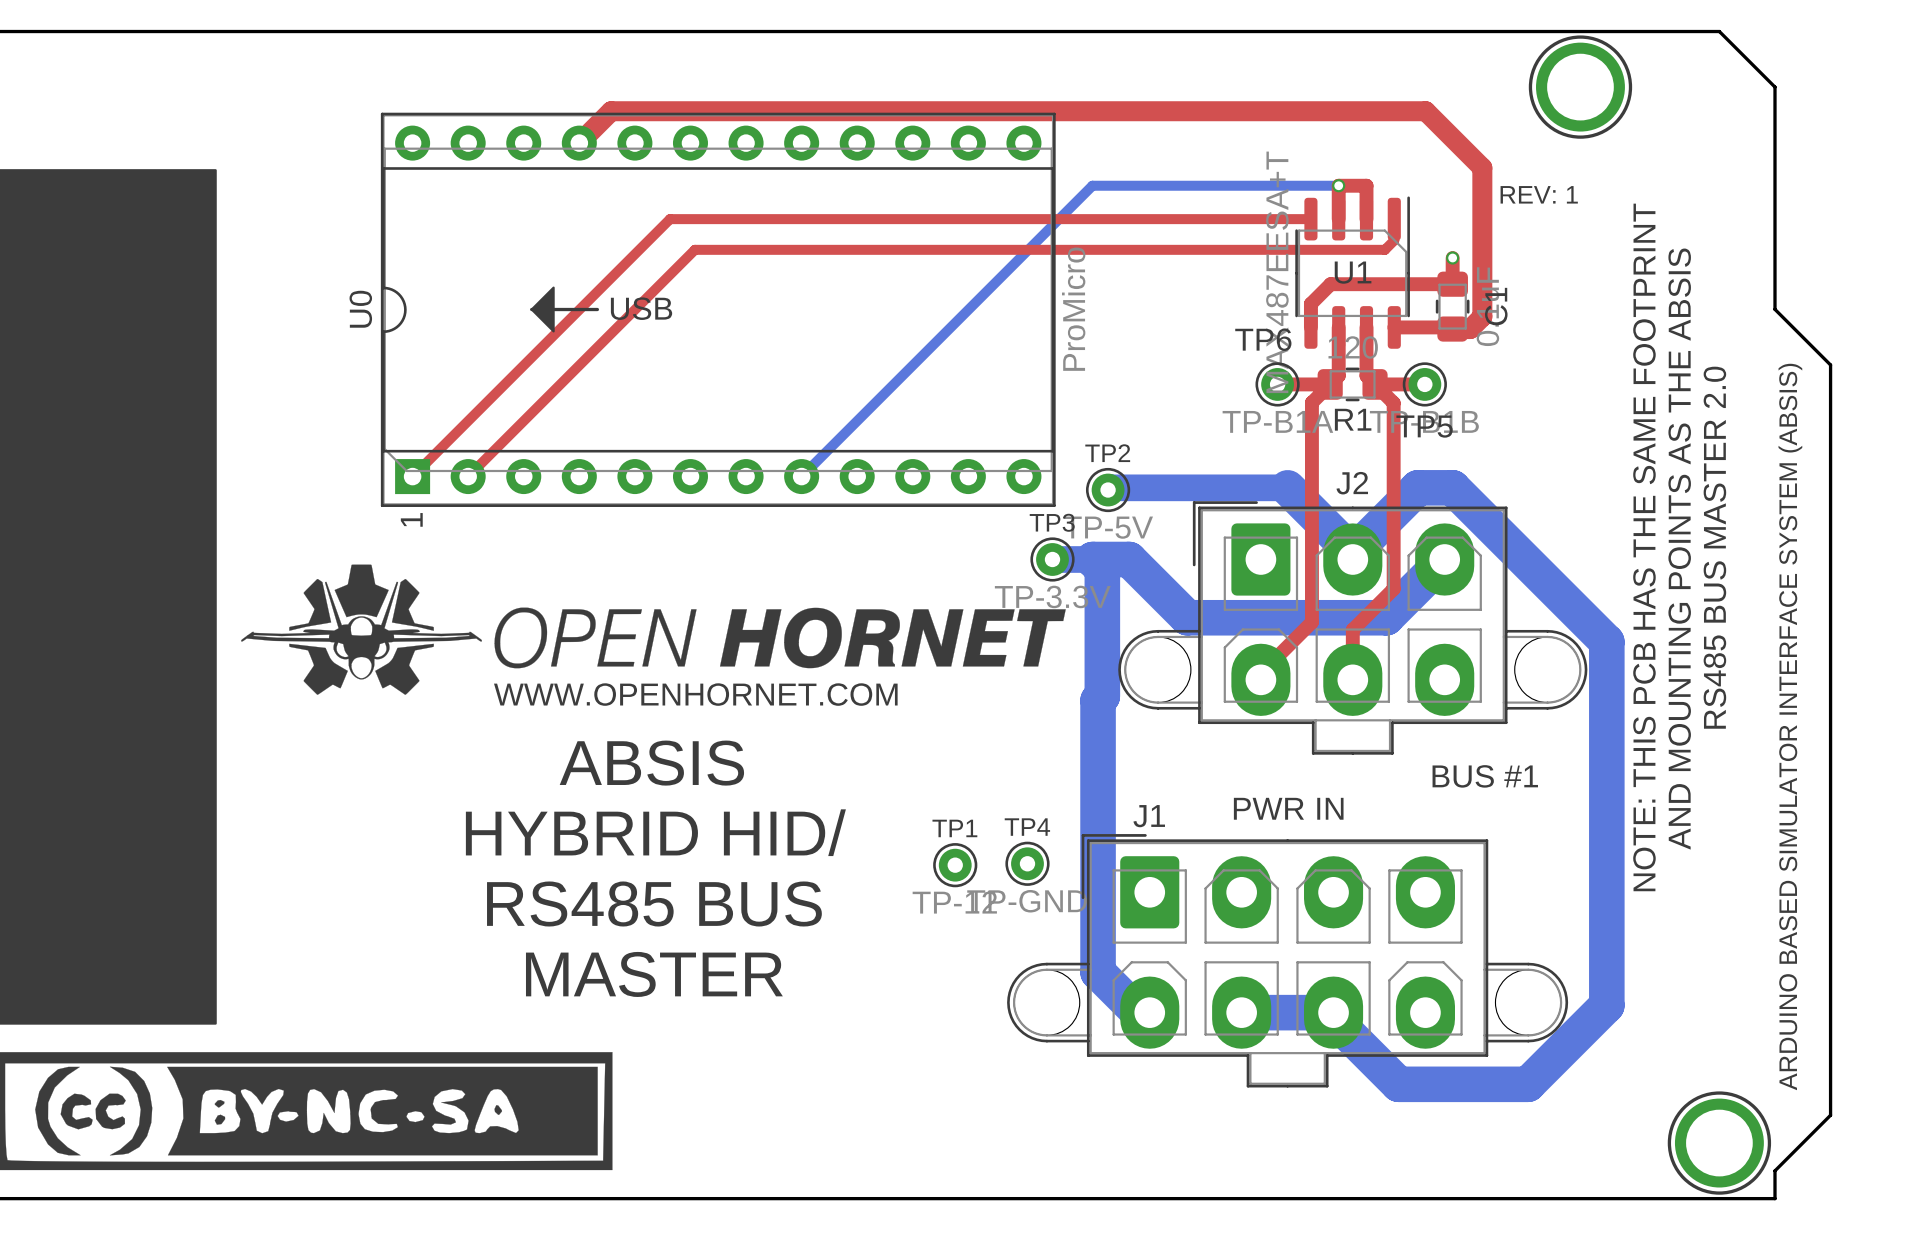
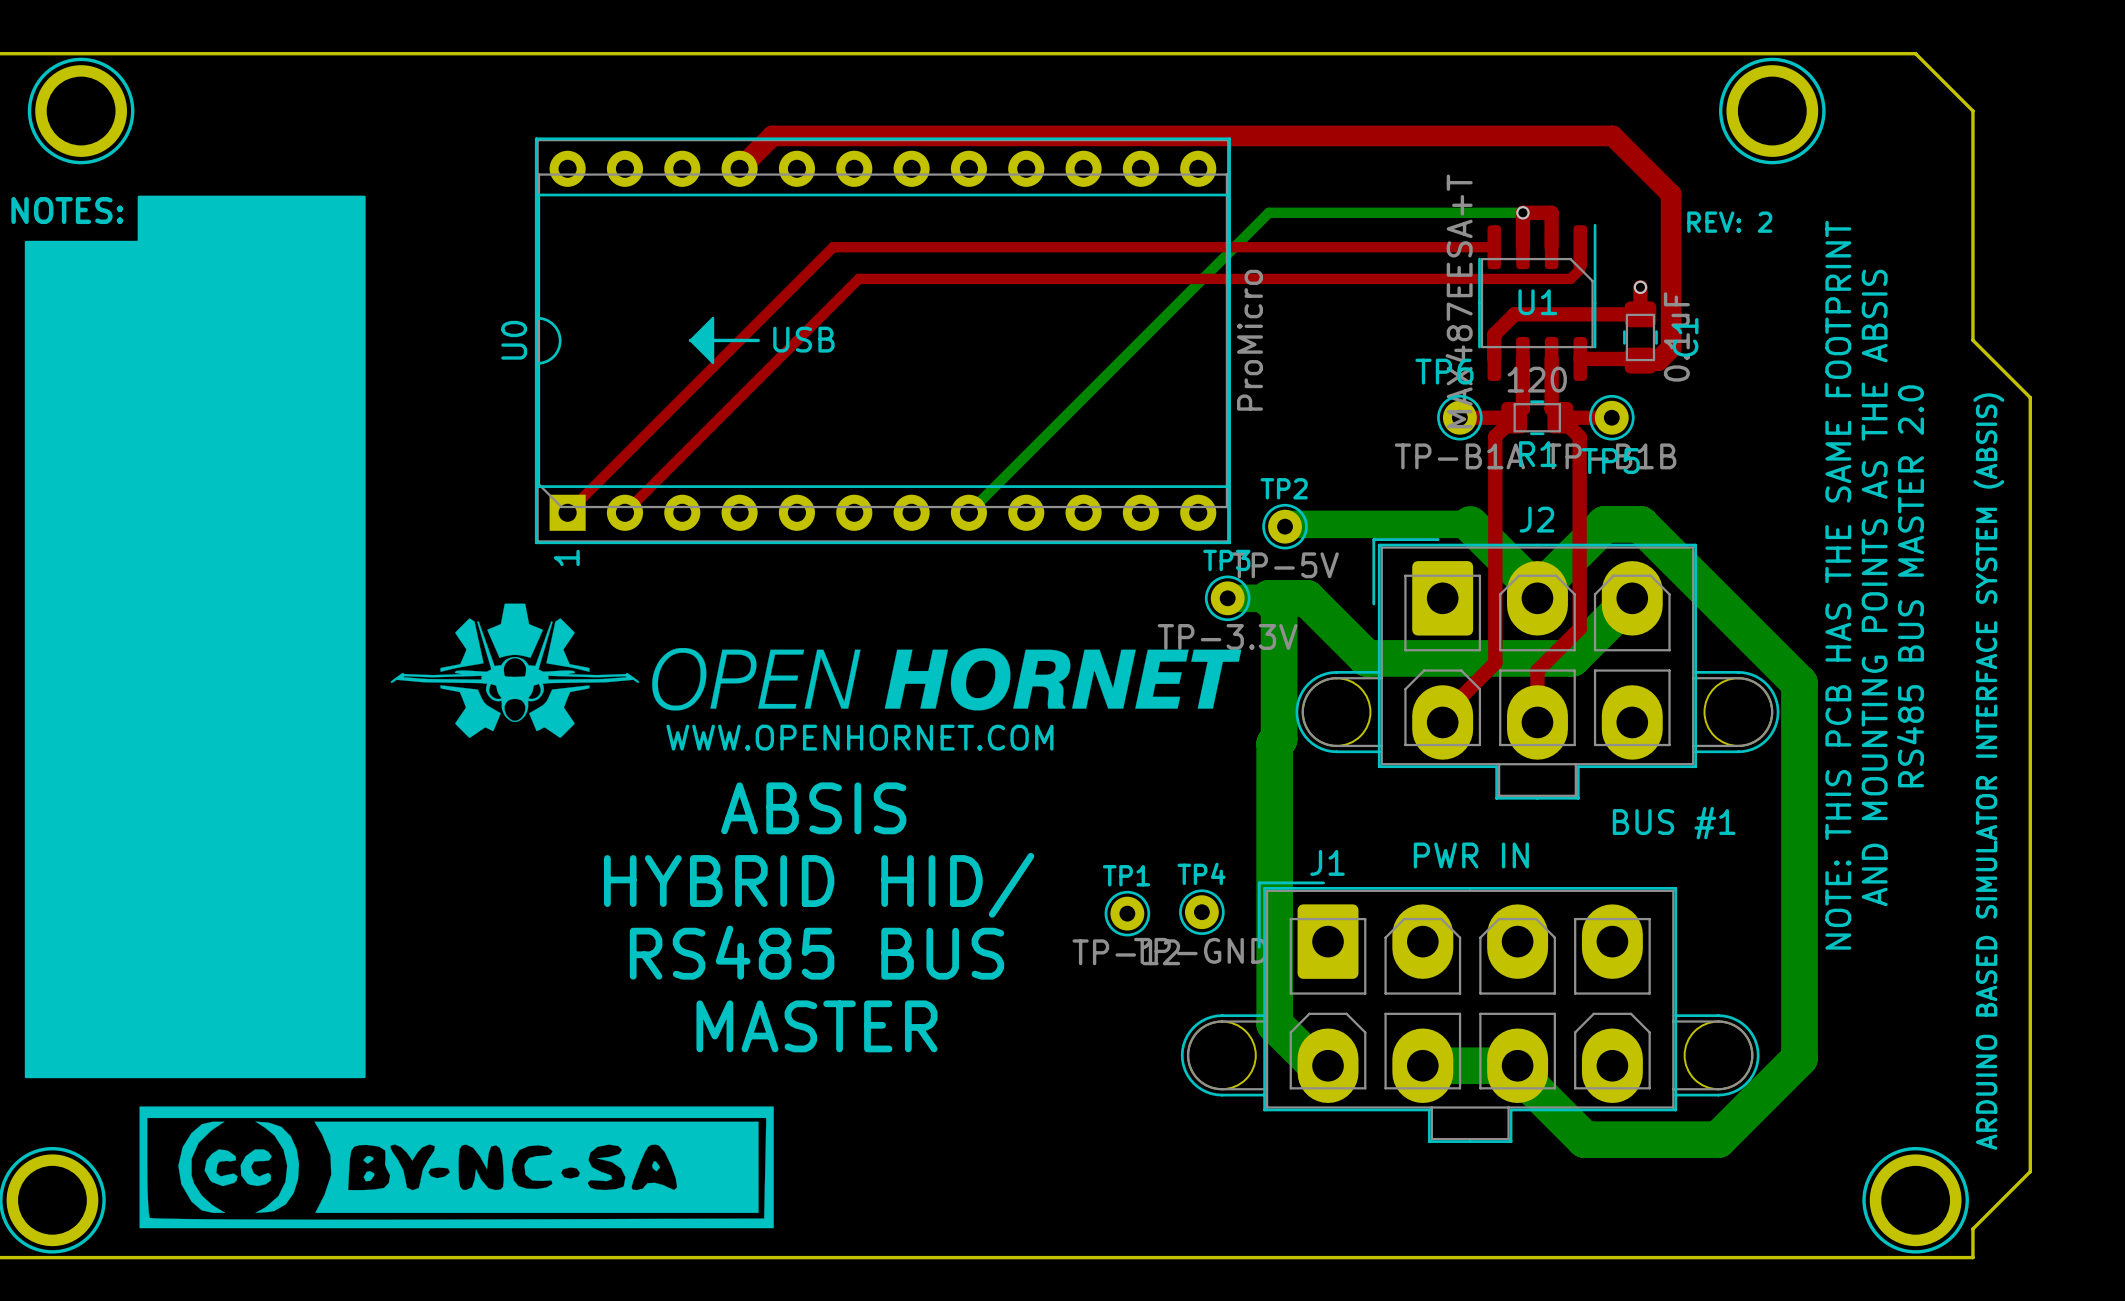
text: REV: 1 (1539, 194) -> REV: 2 (1729, 222)

